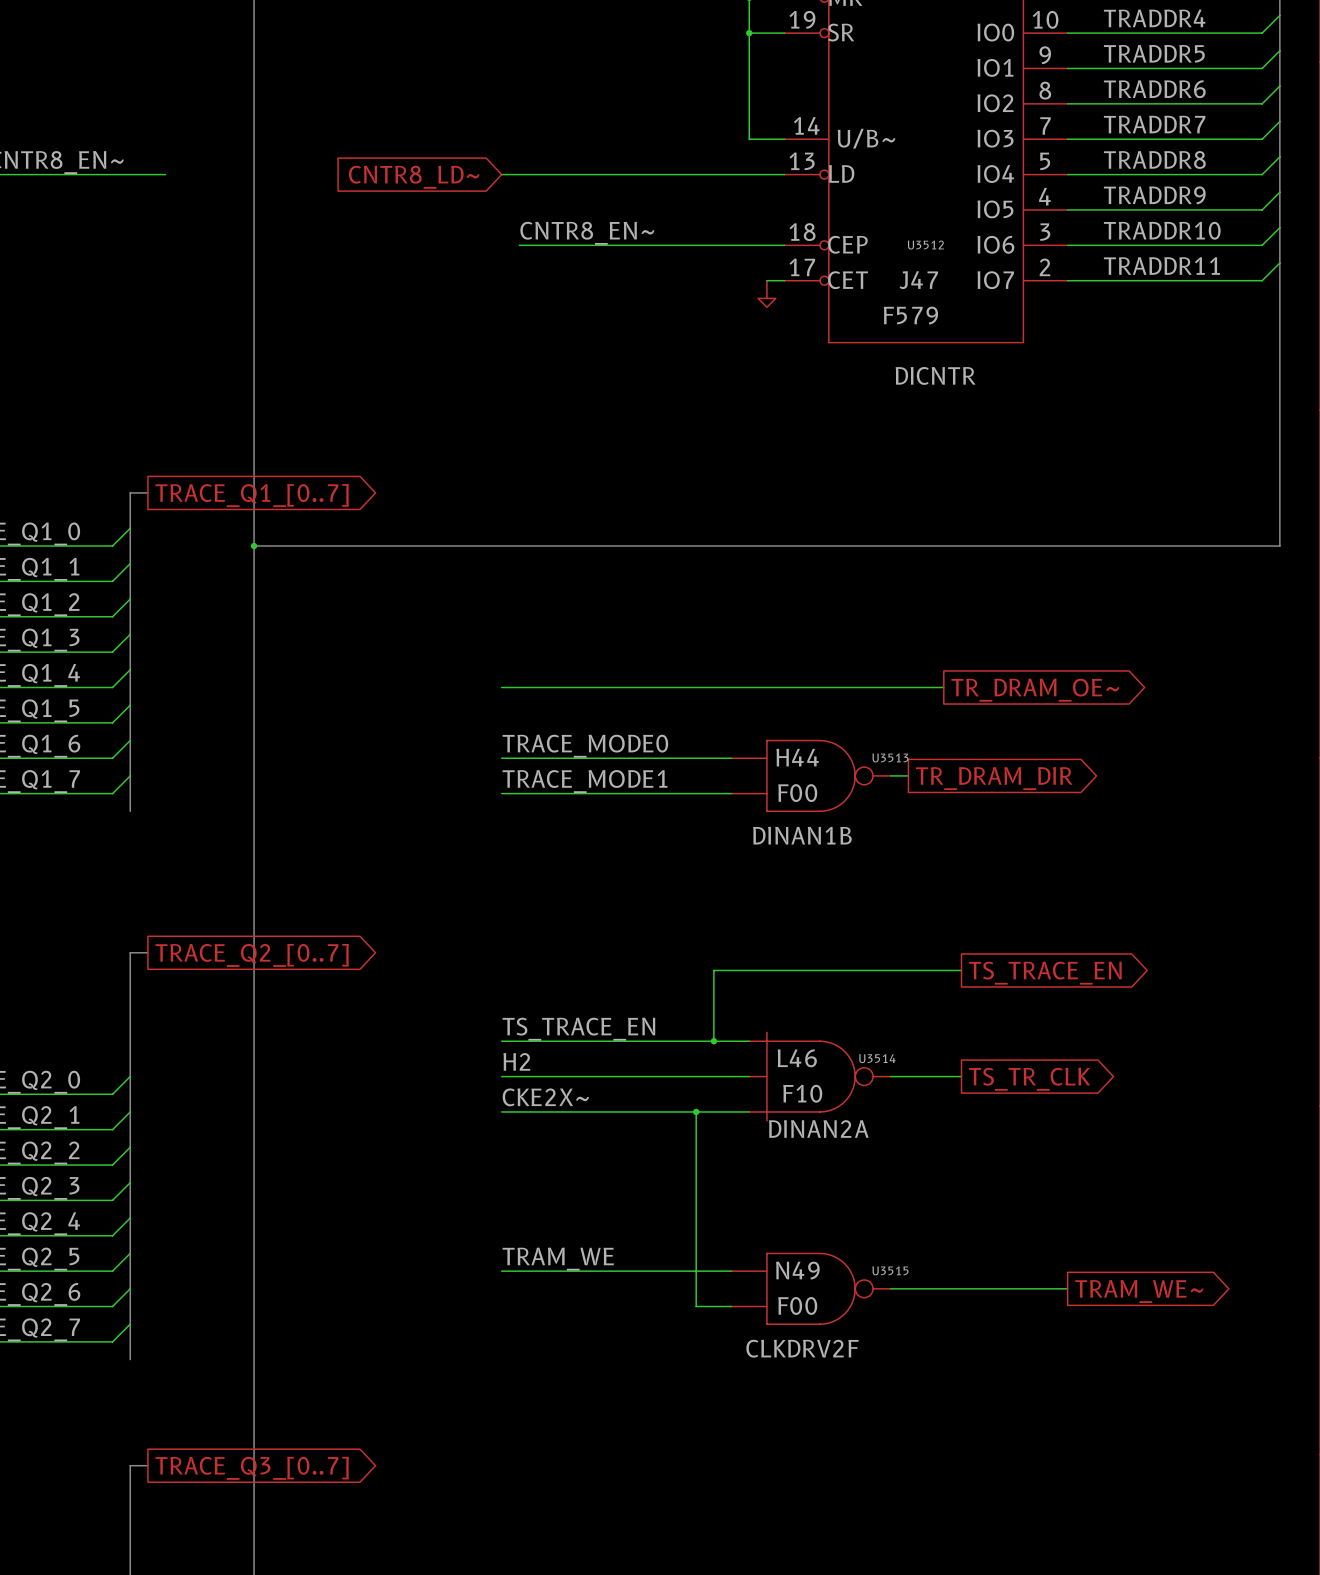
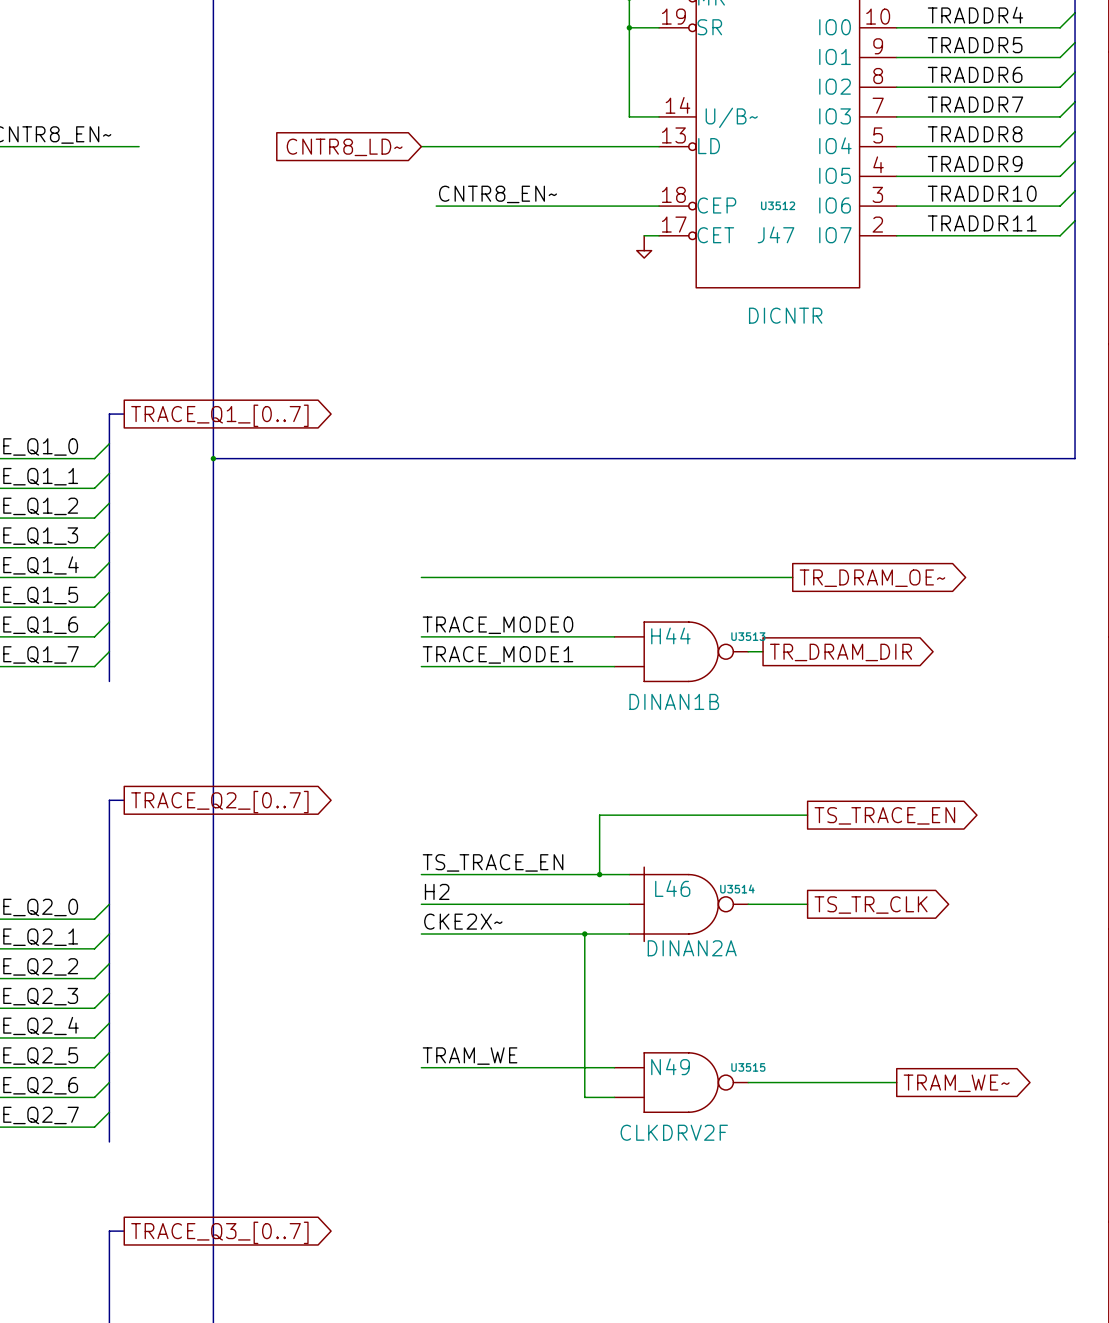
U3512 value: F579 (910, 315) -> none
U3513 value: F00 (797, 793) -> none
U3514 value: F10 (802, 1093) -> none
U3515 value: F00 (797, 1305) -> none

